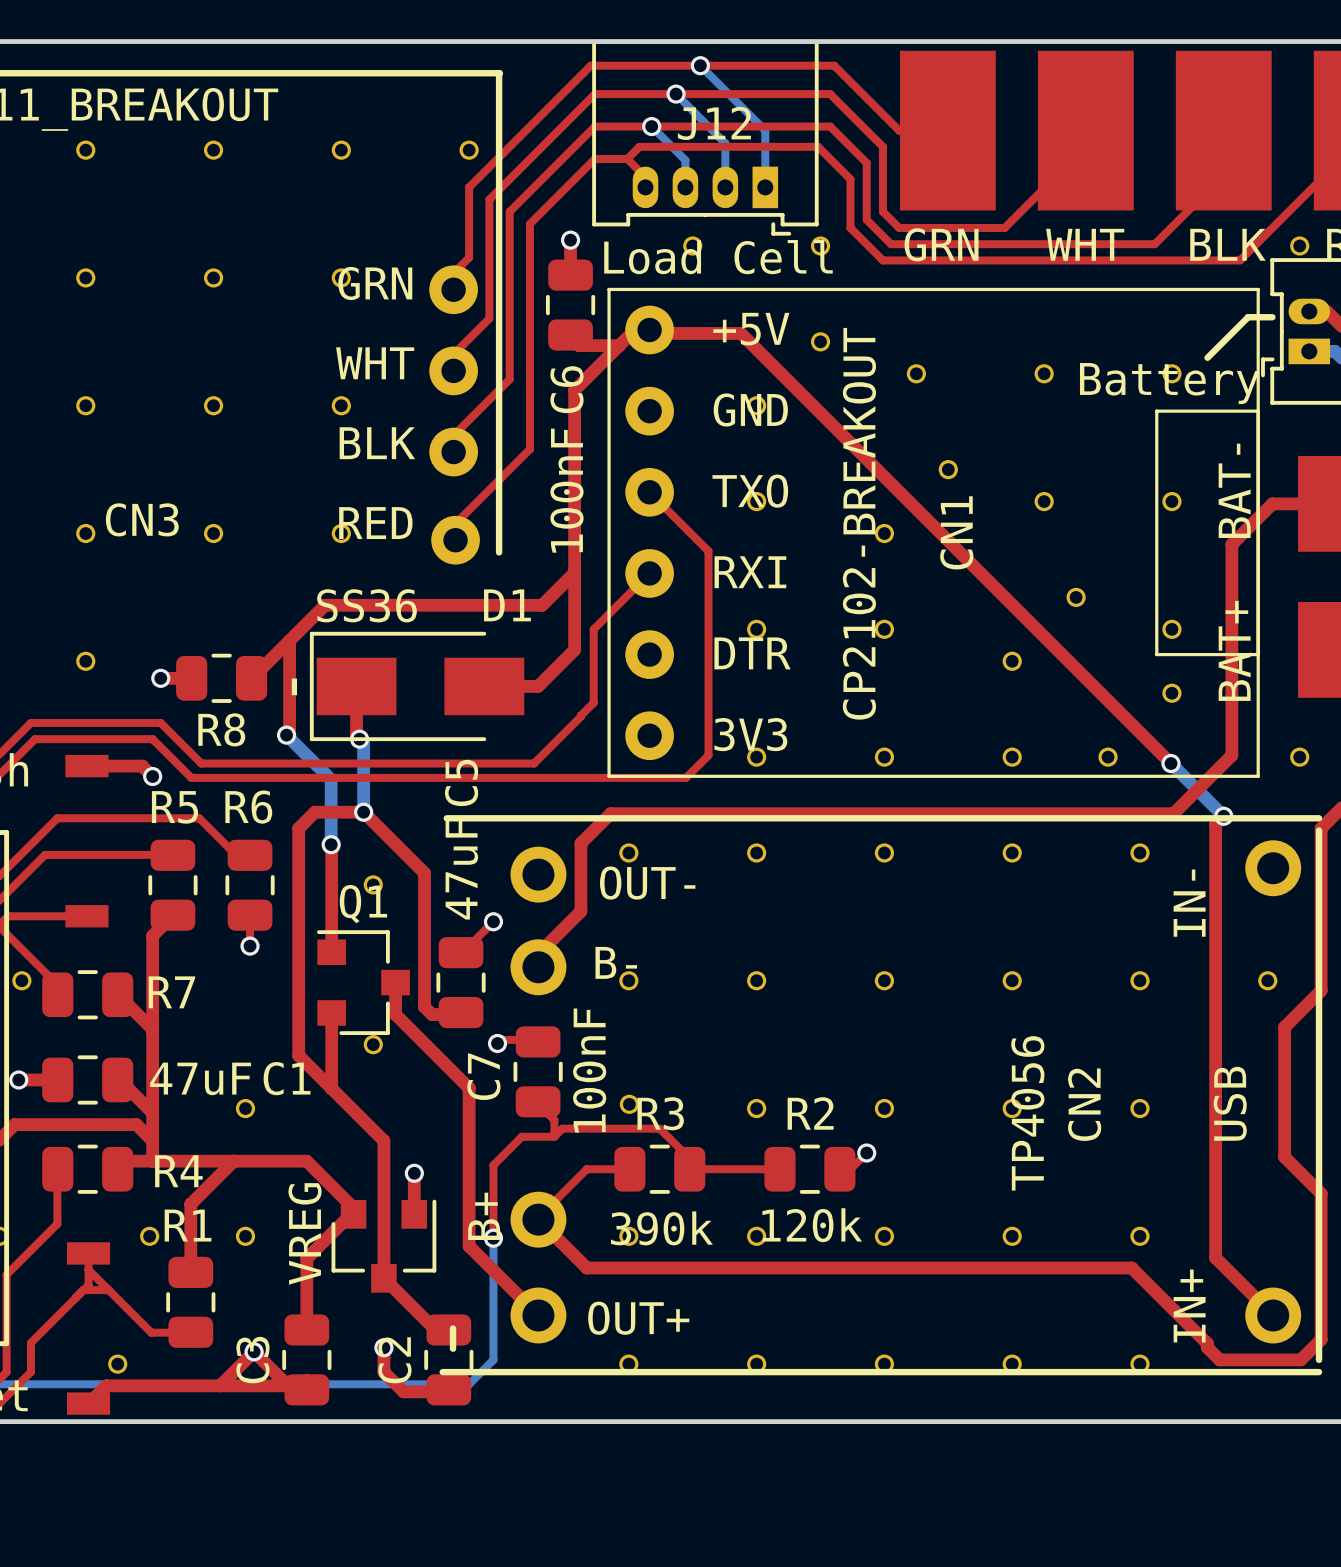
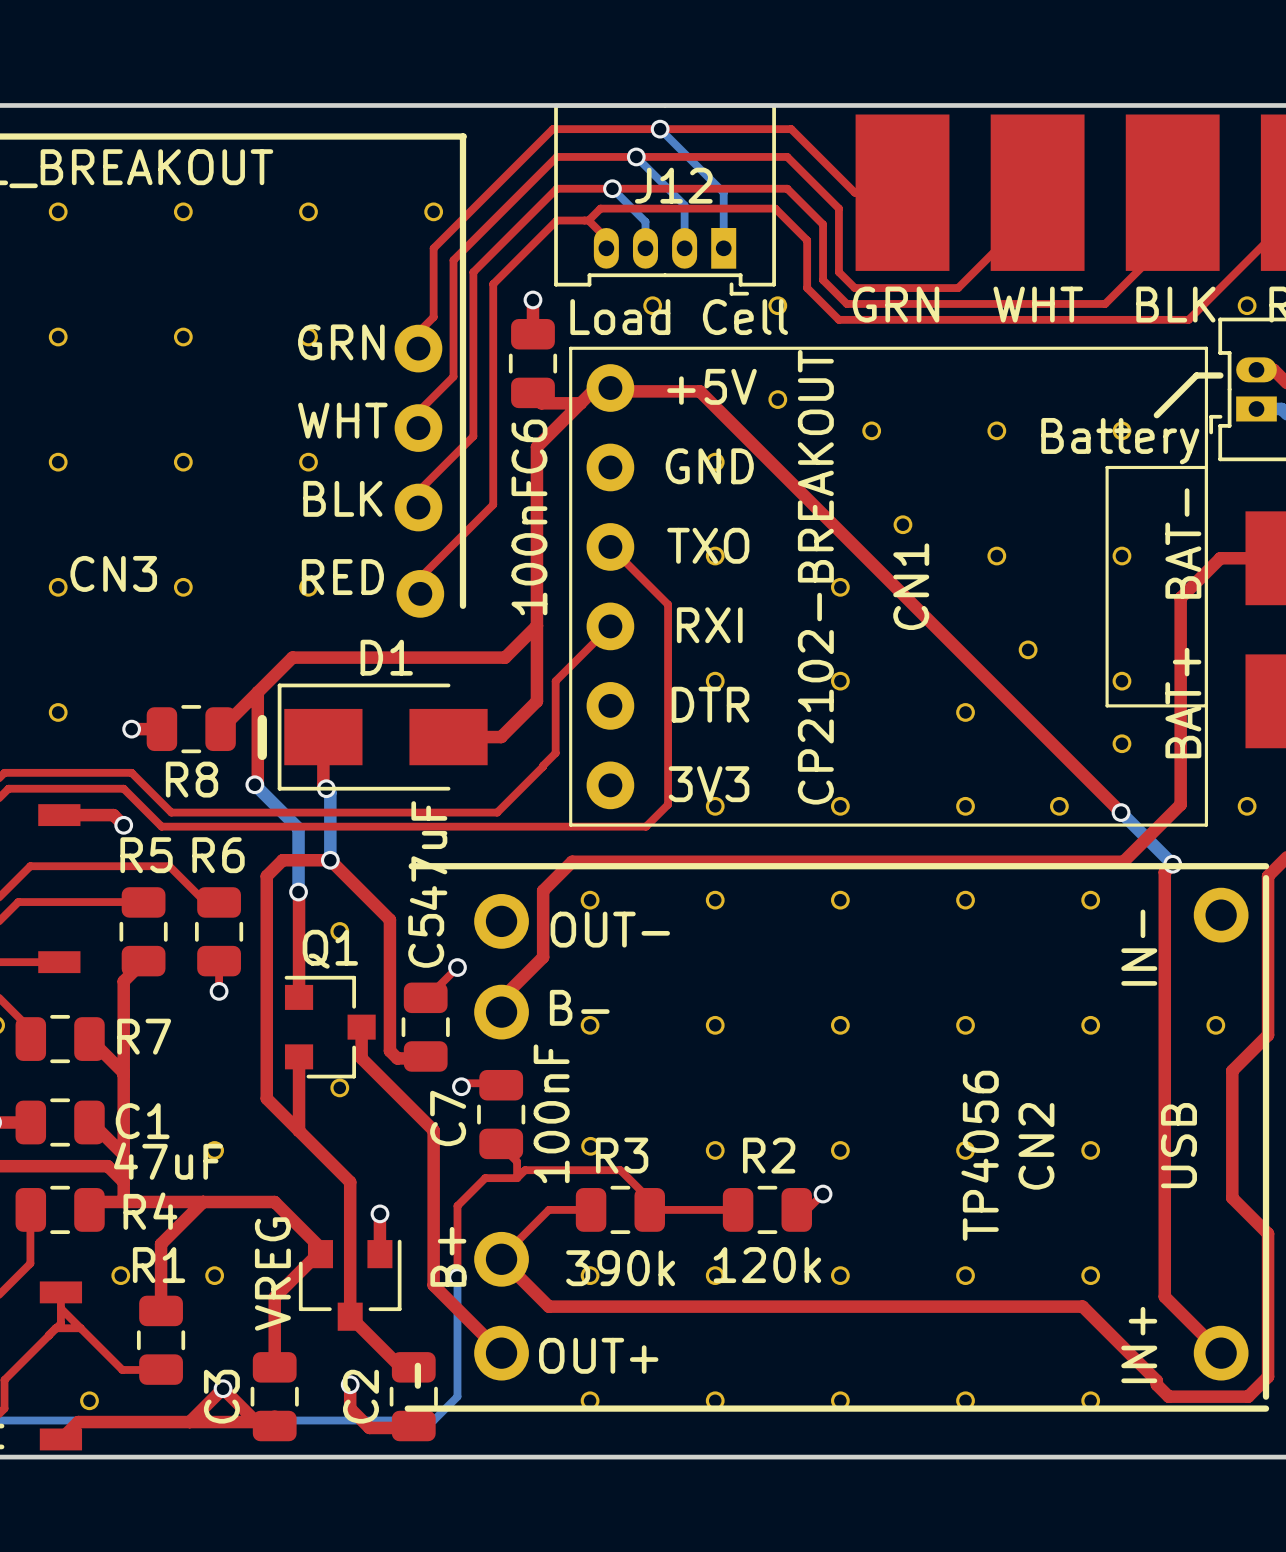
D1 value: SS36 (366, 605) -> none
D1 name position: D1 (507, 605) -> D1 (386, 657)
C5 name position: C5 (461, 782) -> C5 (426, 940)
C5 value position: 47uF (461, 869) -> 47uF (428, 855)
C1 value position: 47uF (200, 1078) -> 47uF (168, 1161)
C1 name position: C1 (287, 1078) -> C1 (142, 1121)

